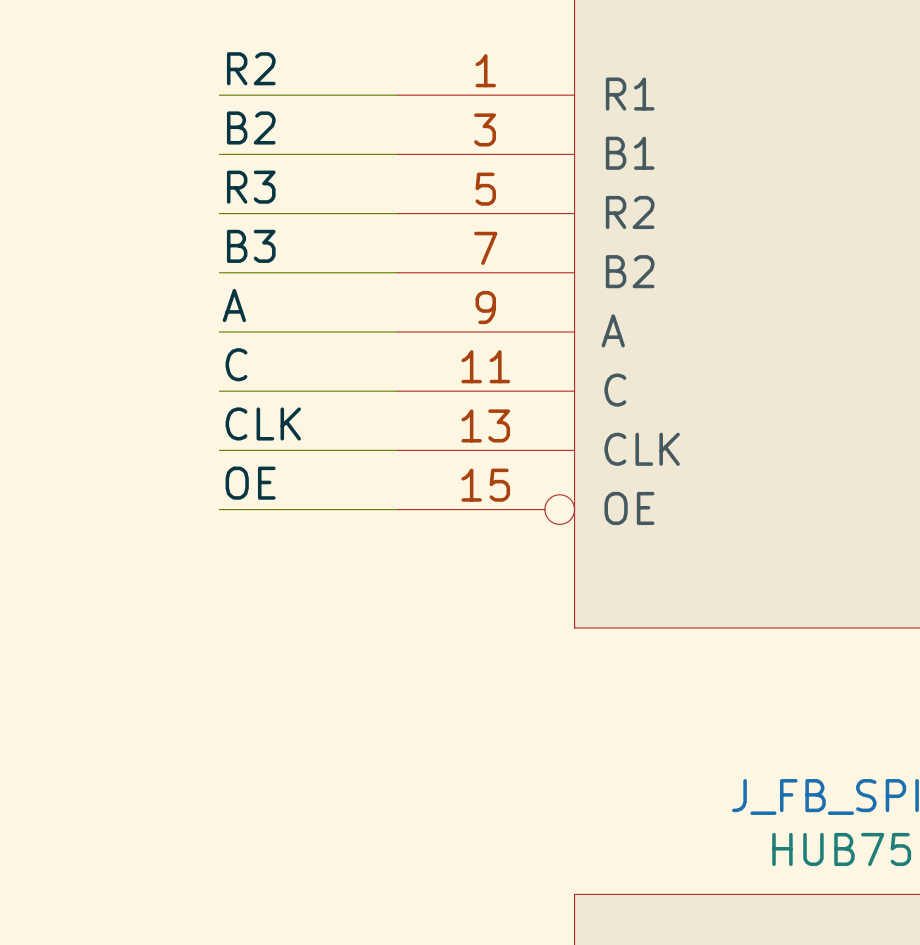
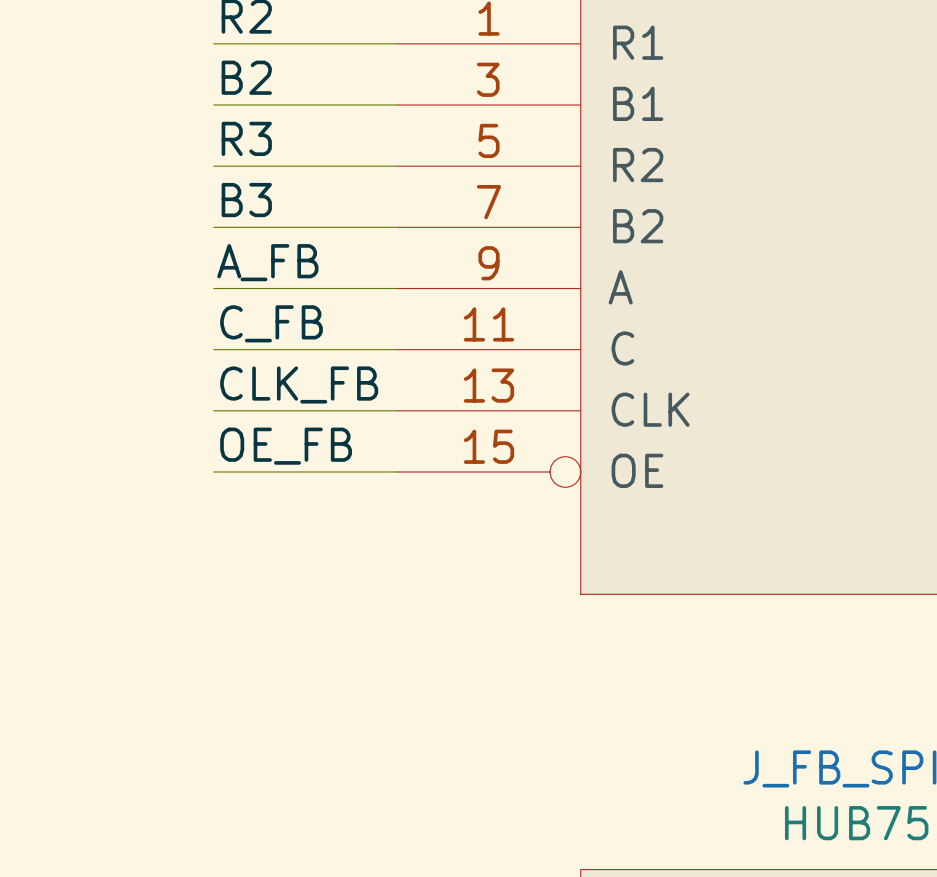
label: A (234, 305) -> A_FB (267, 262)
label: C (236, 364) -> C_FB (271, 323)
label: CLK (263, 423) -> CLK_FB (299, 385)
label: OE (250, 483) -> OE_FB (286, 446)

